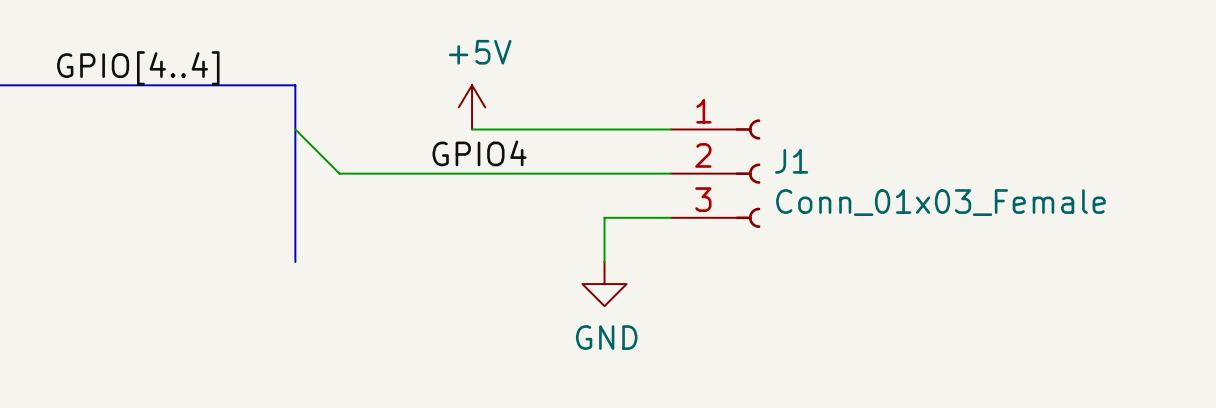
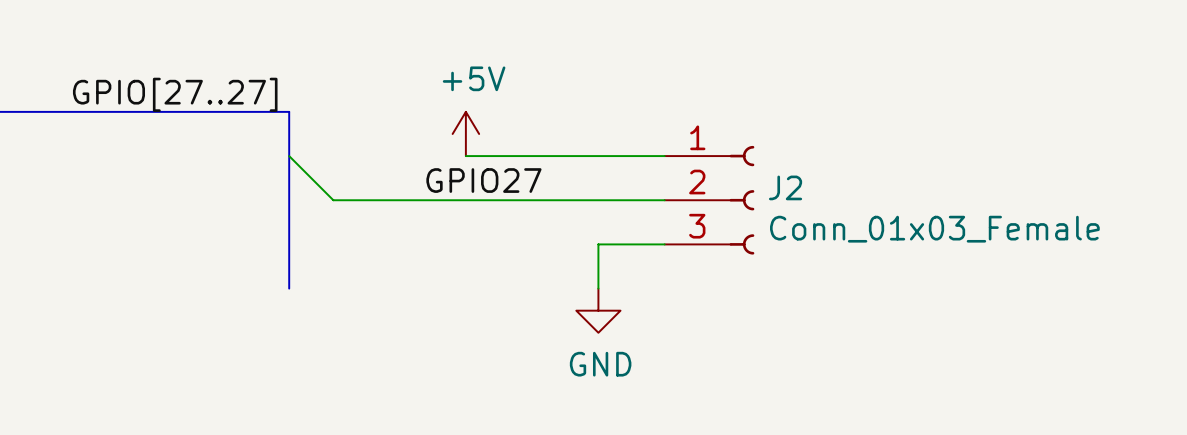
label: GPIO[4..4] (138, 68) -> GPIO[27..27] (175, 94)
label: GPIO4 (479, 153) -> GPIO27 (483, 180)
J1 name: J1 (791, 161) -> J2 (785, 187)

